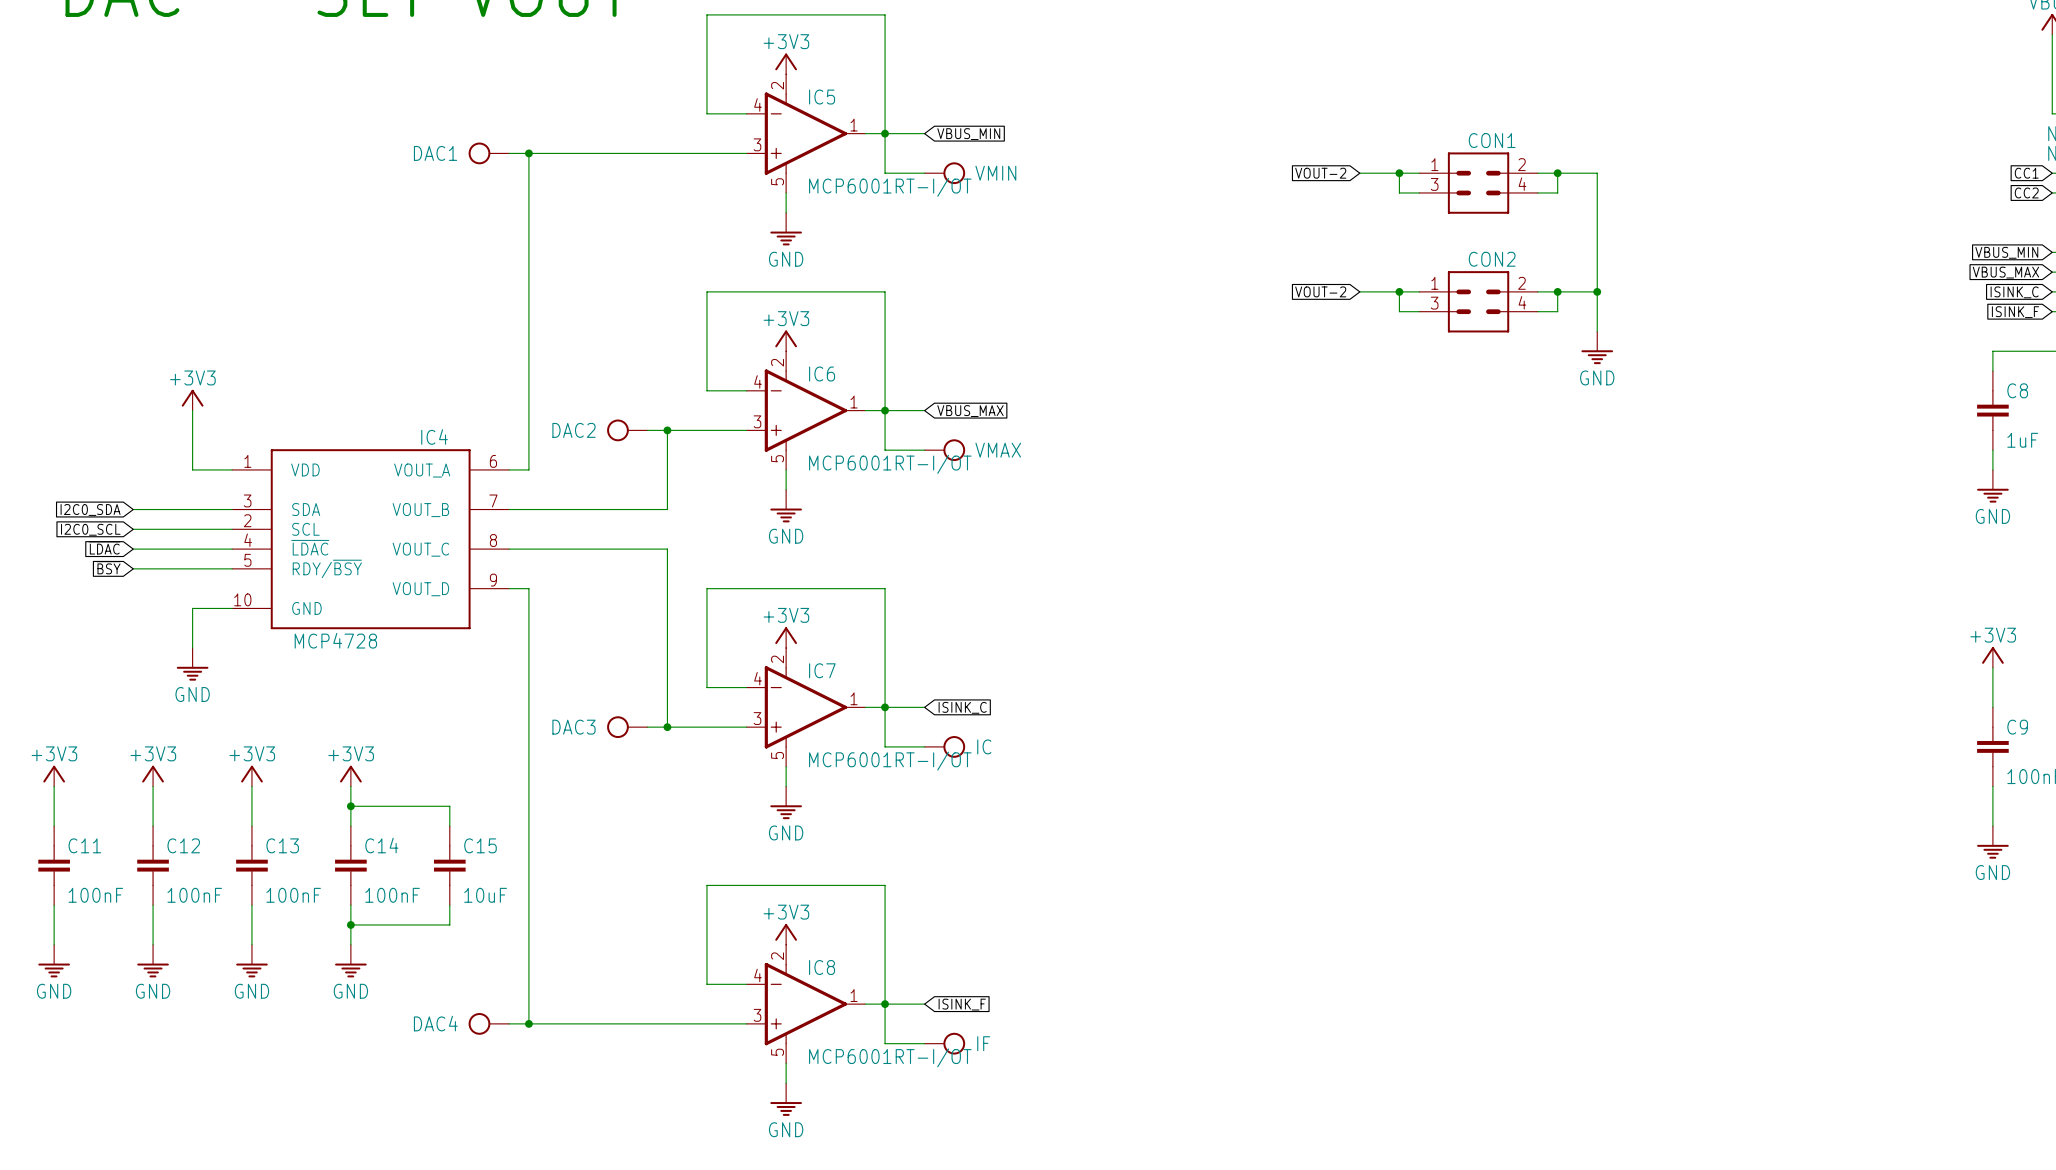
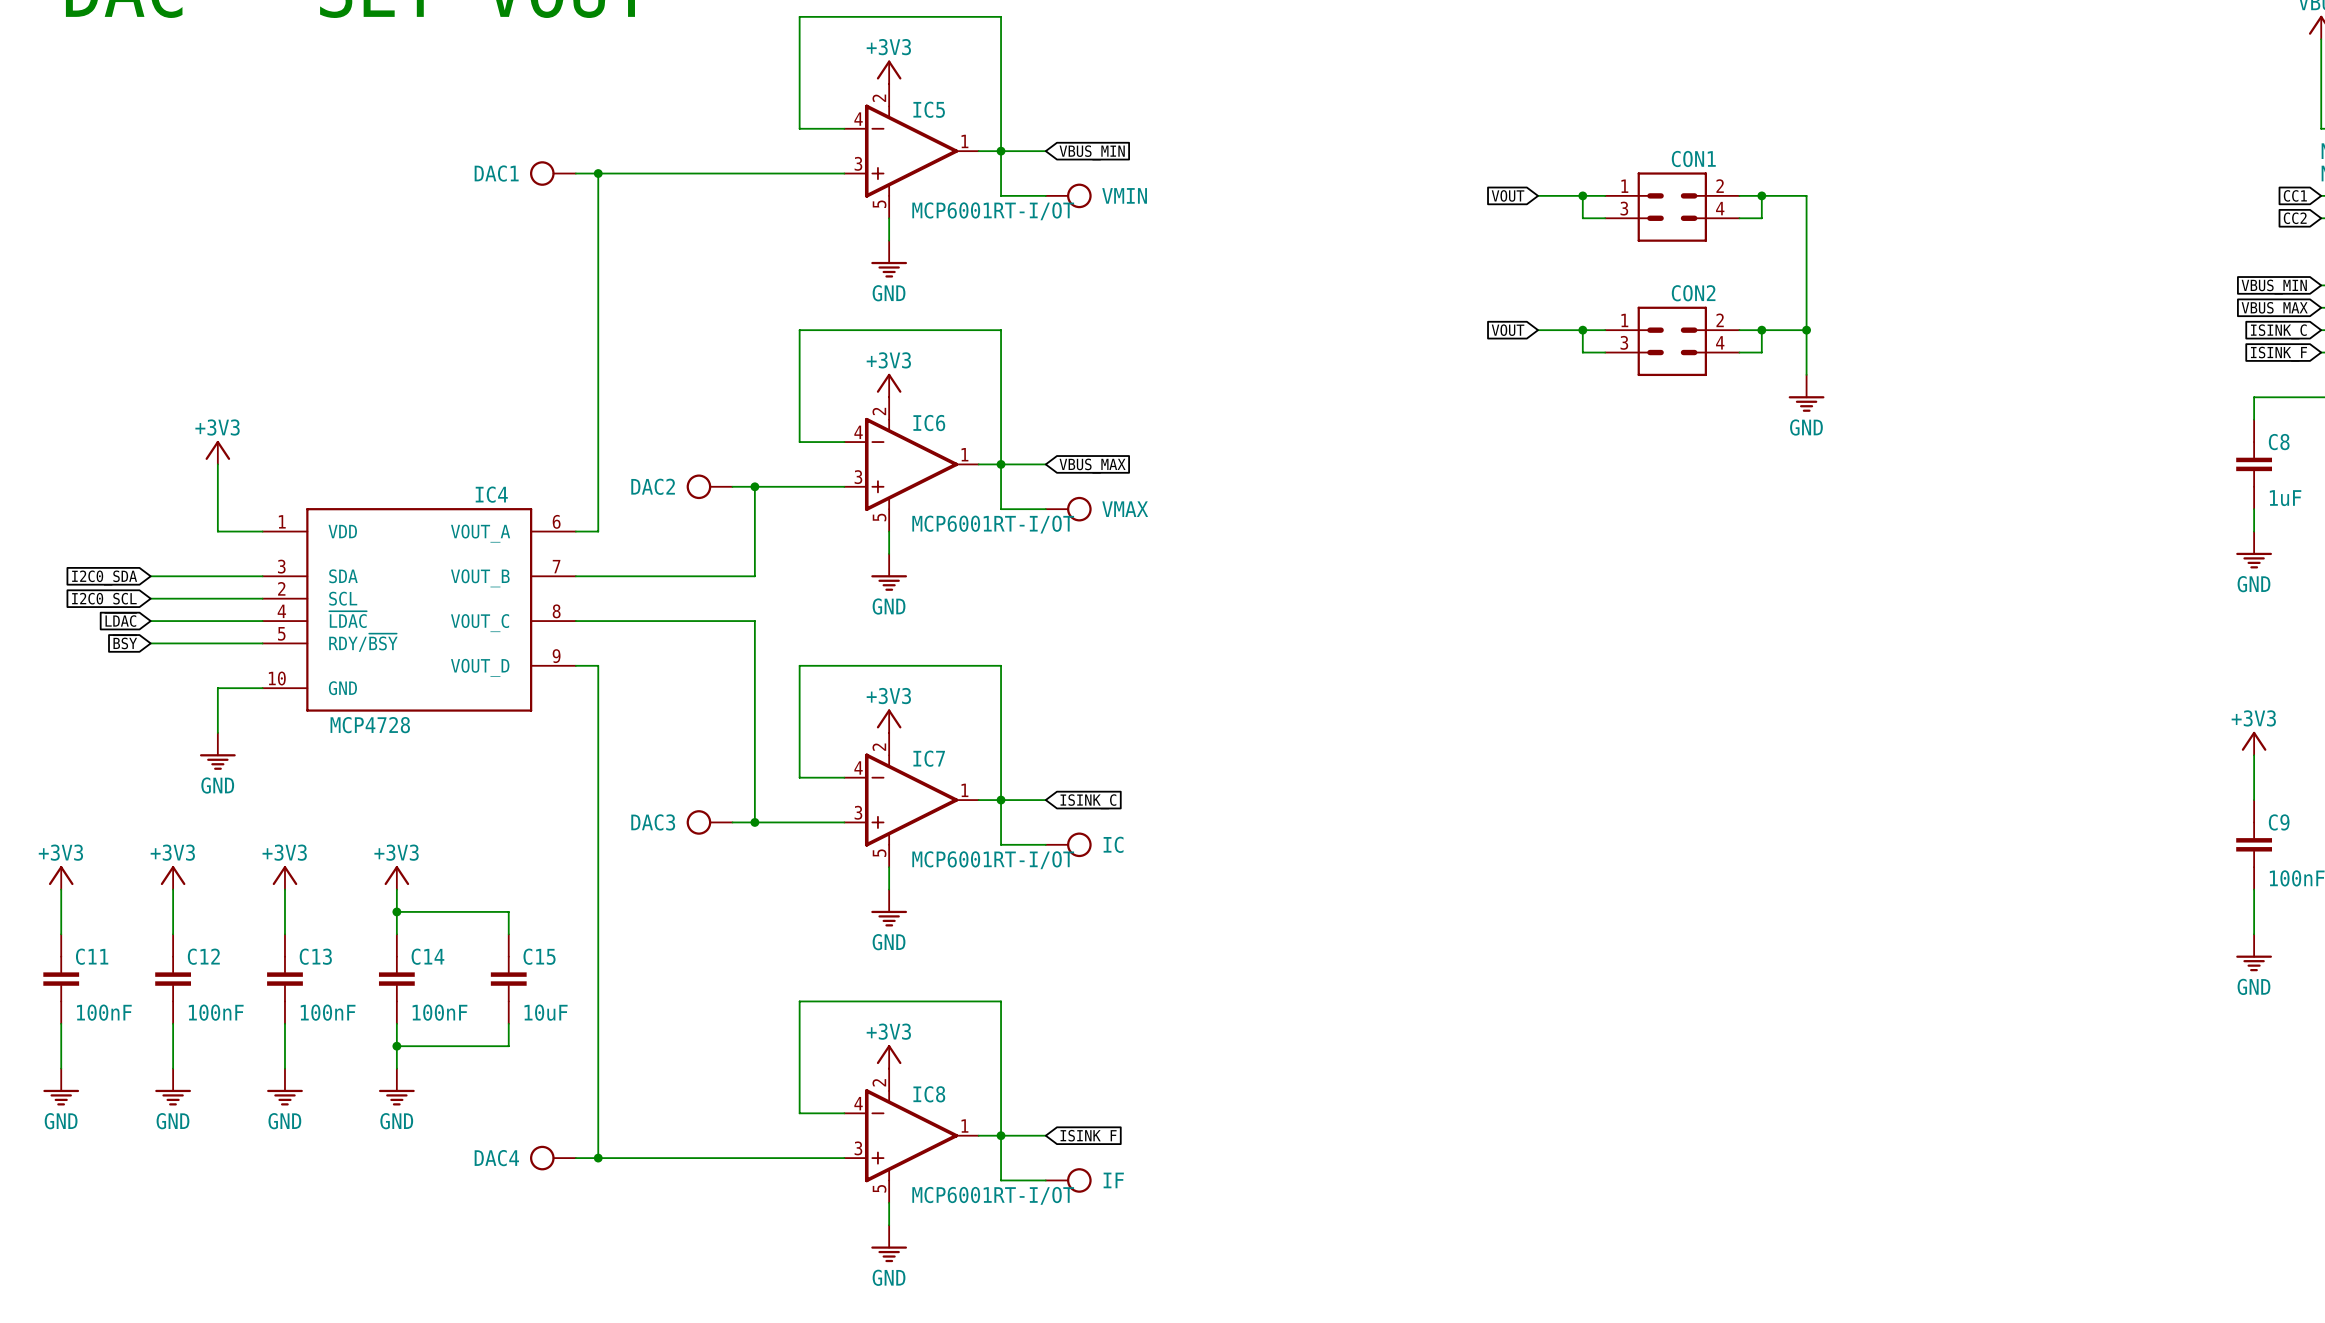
global label: VOUT-2 (1320, 173) -> VOUT (1508, 195)
global label: VOUT-2 (1320, 291) -> VOUT (1508, 330)

